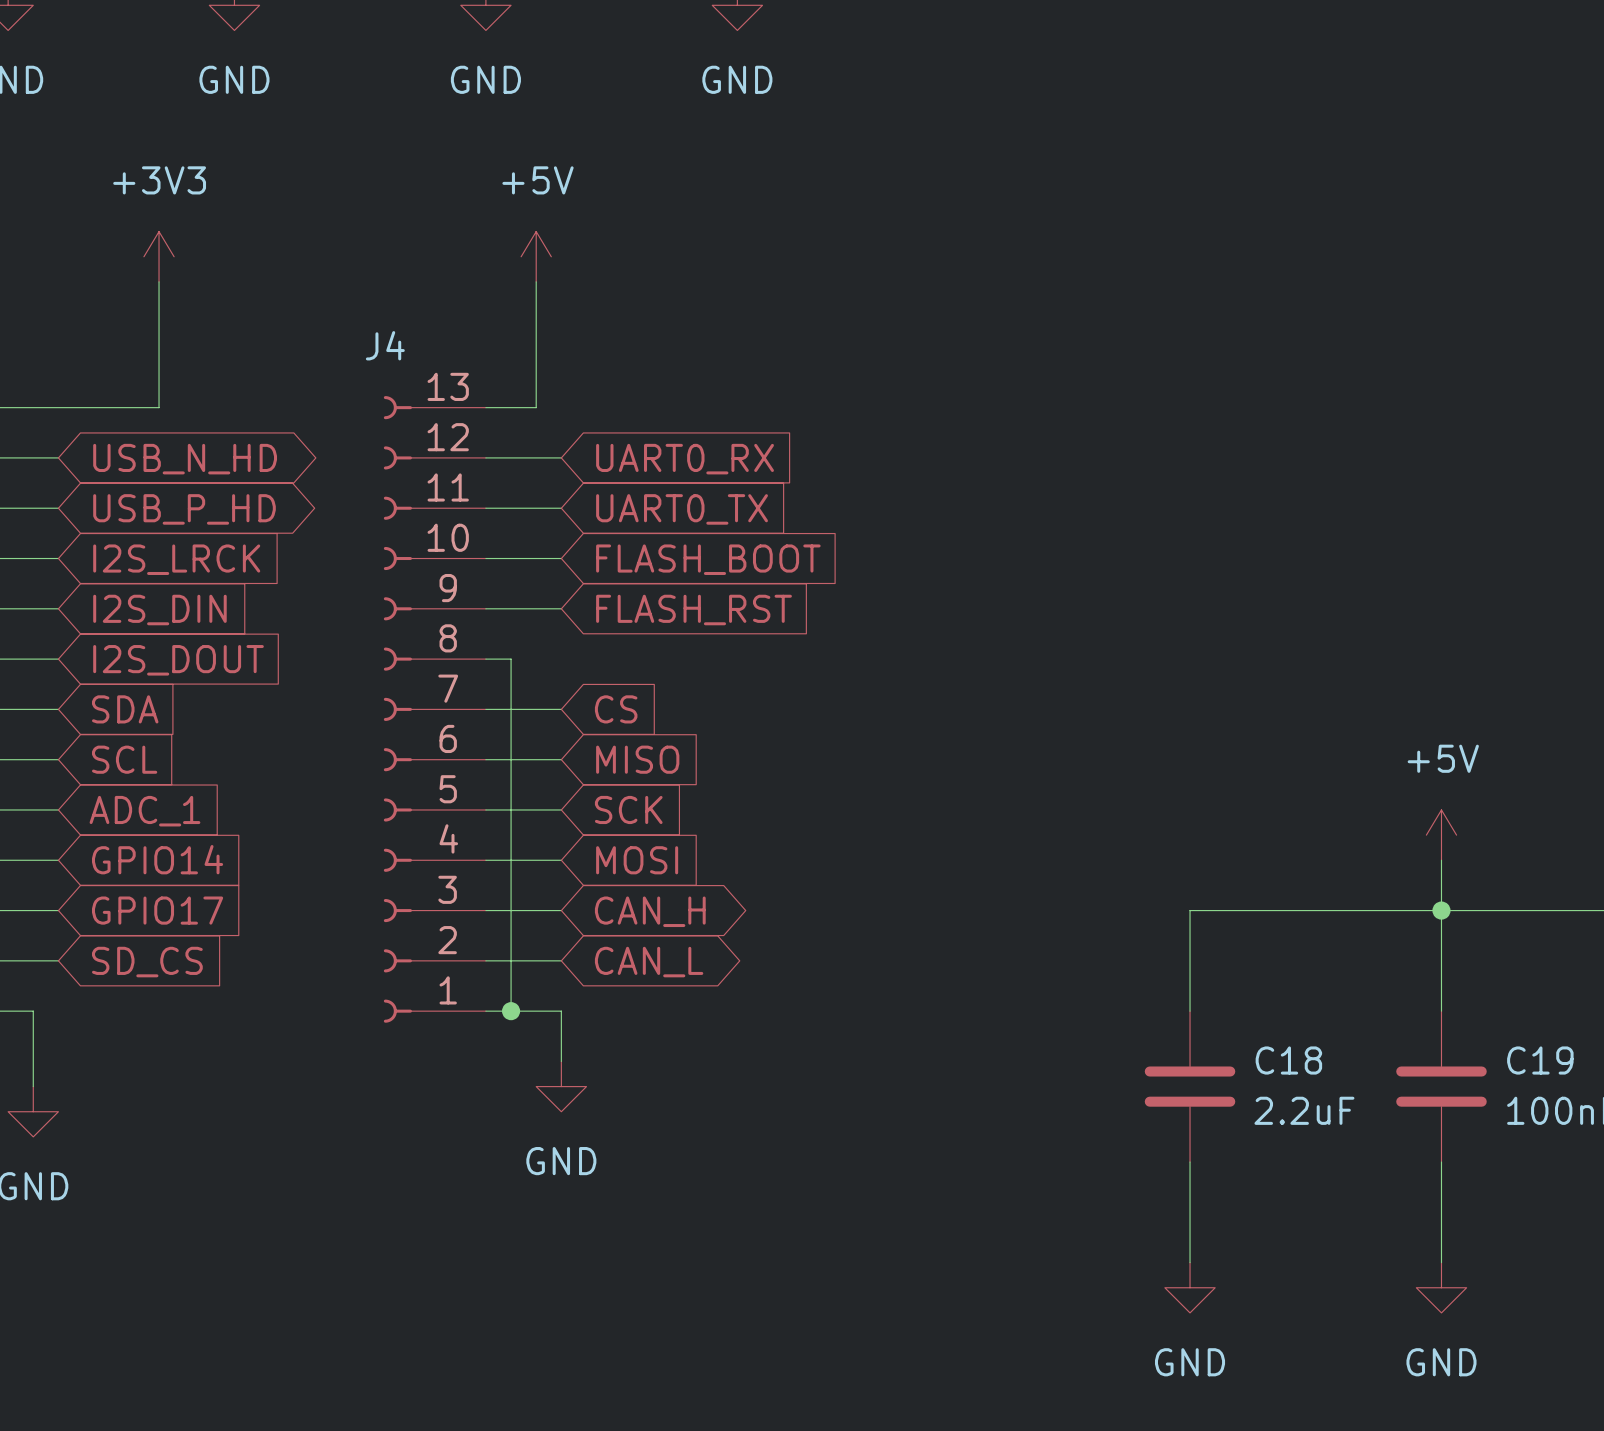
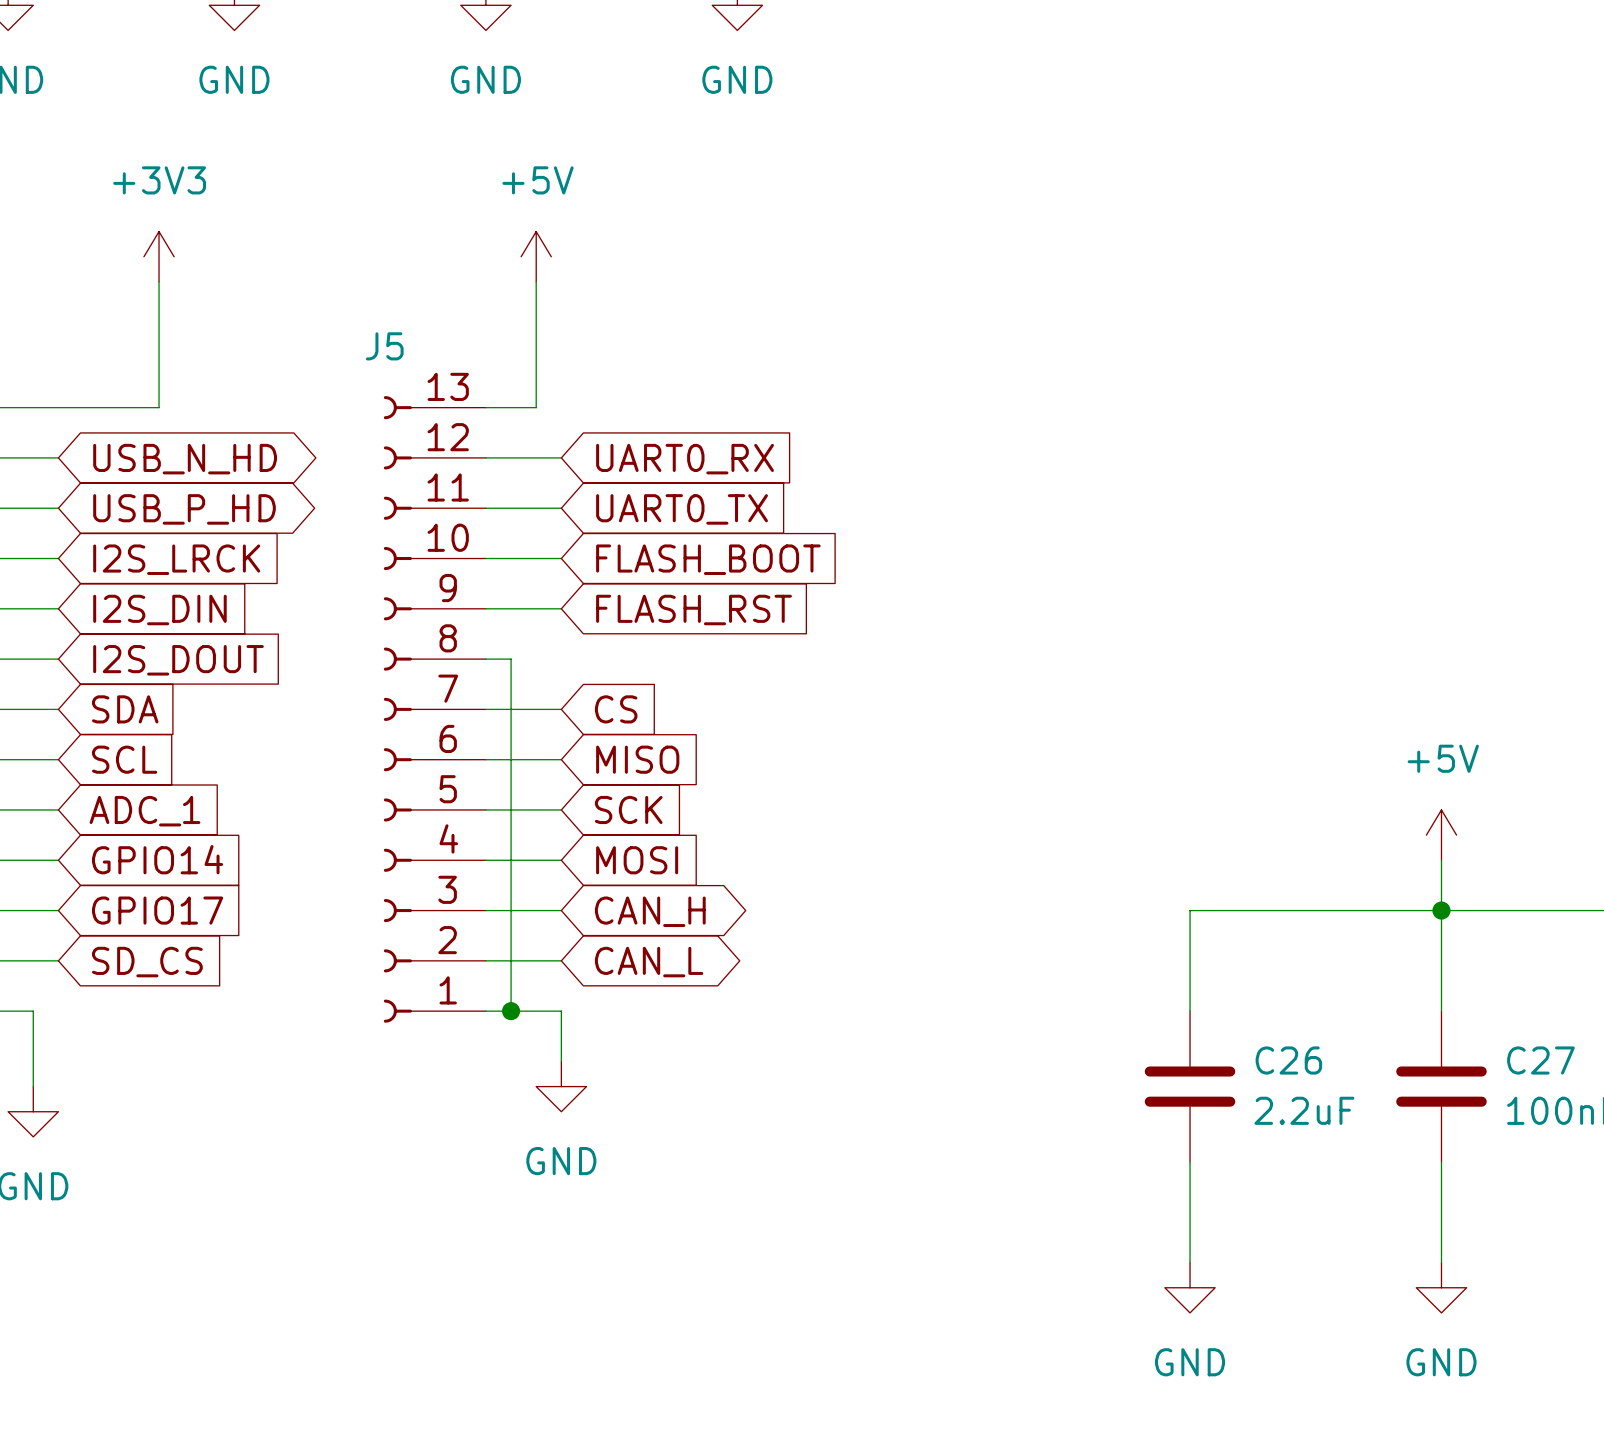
J4 name: J4 (385, 345) -> J5 (384, 346)
C18 name: C18 (1288, 1060) -> C26 (1288, 1060)
C19 name: C19 (1540, 1060) -> C27 (1540, 1060)

